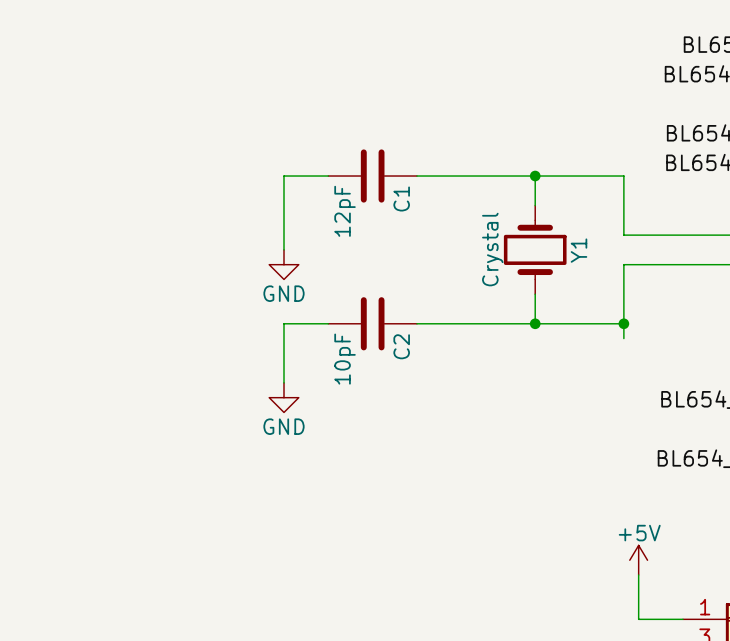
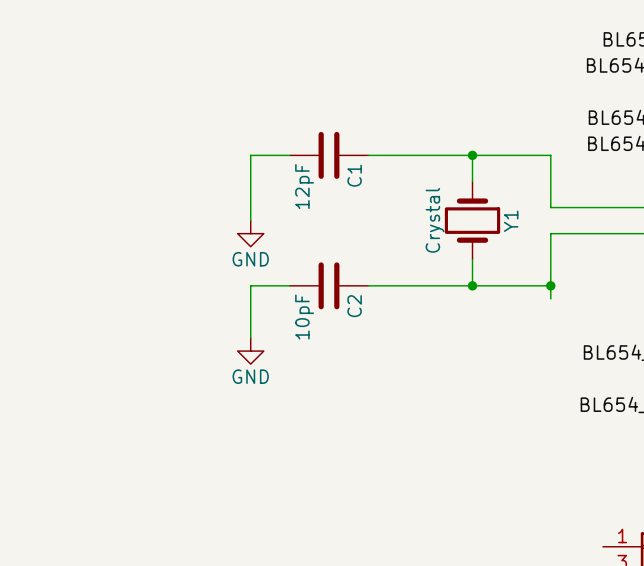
power symbol: +5V (638, 560) -> none
wire: (638, 575) (638, 619) (682, 619) -> none

